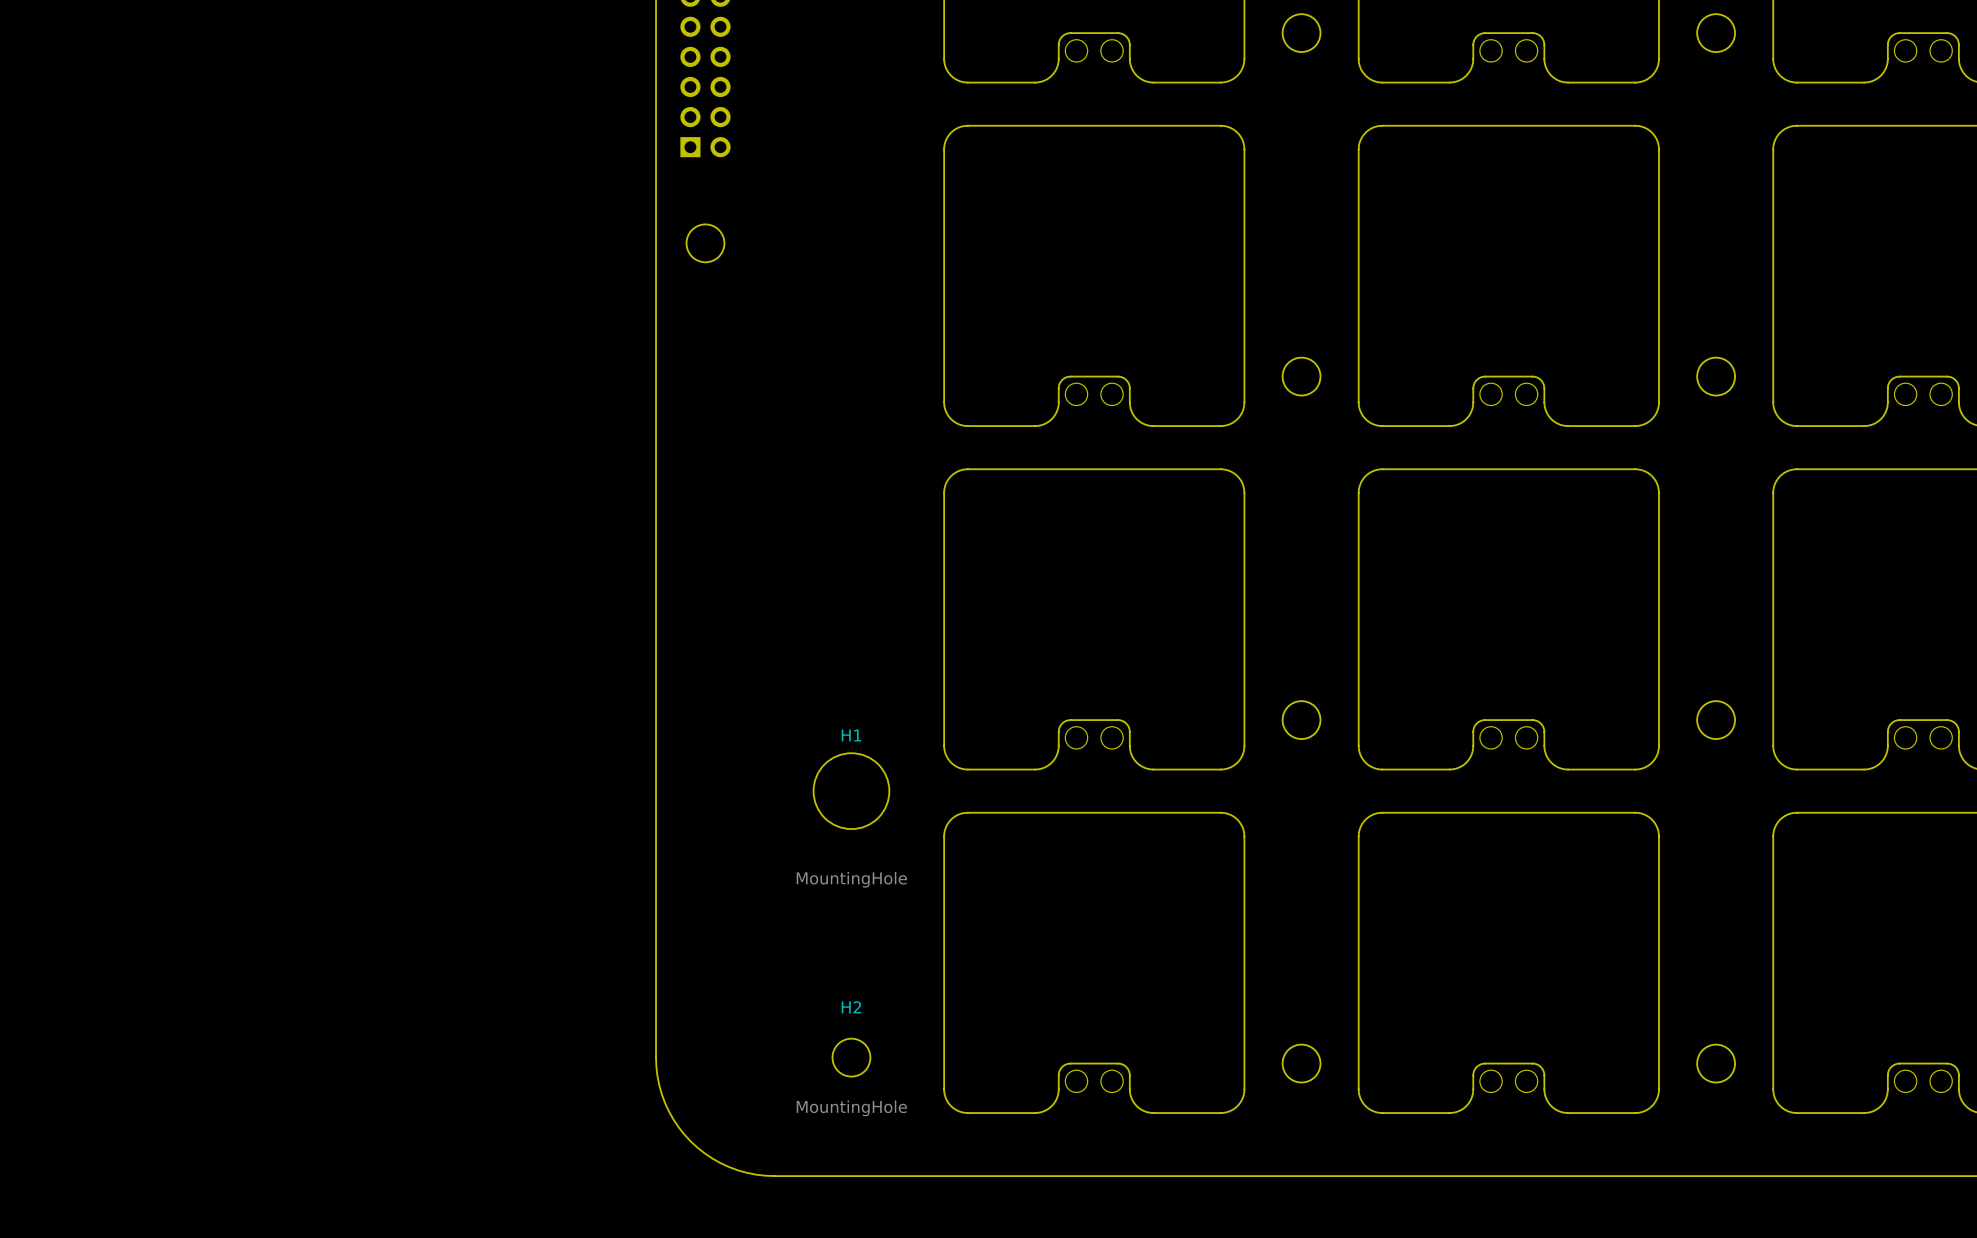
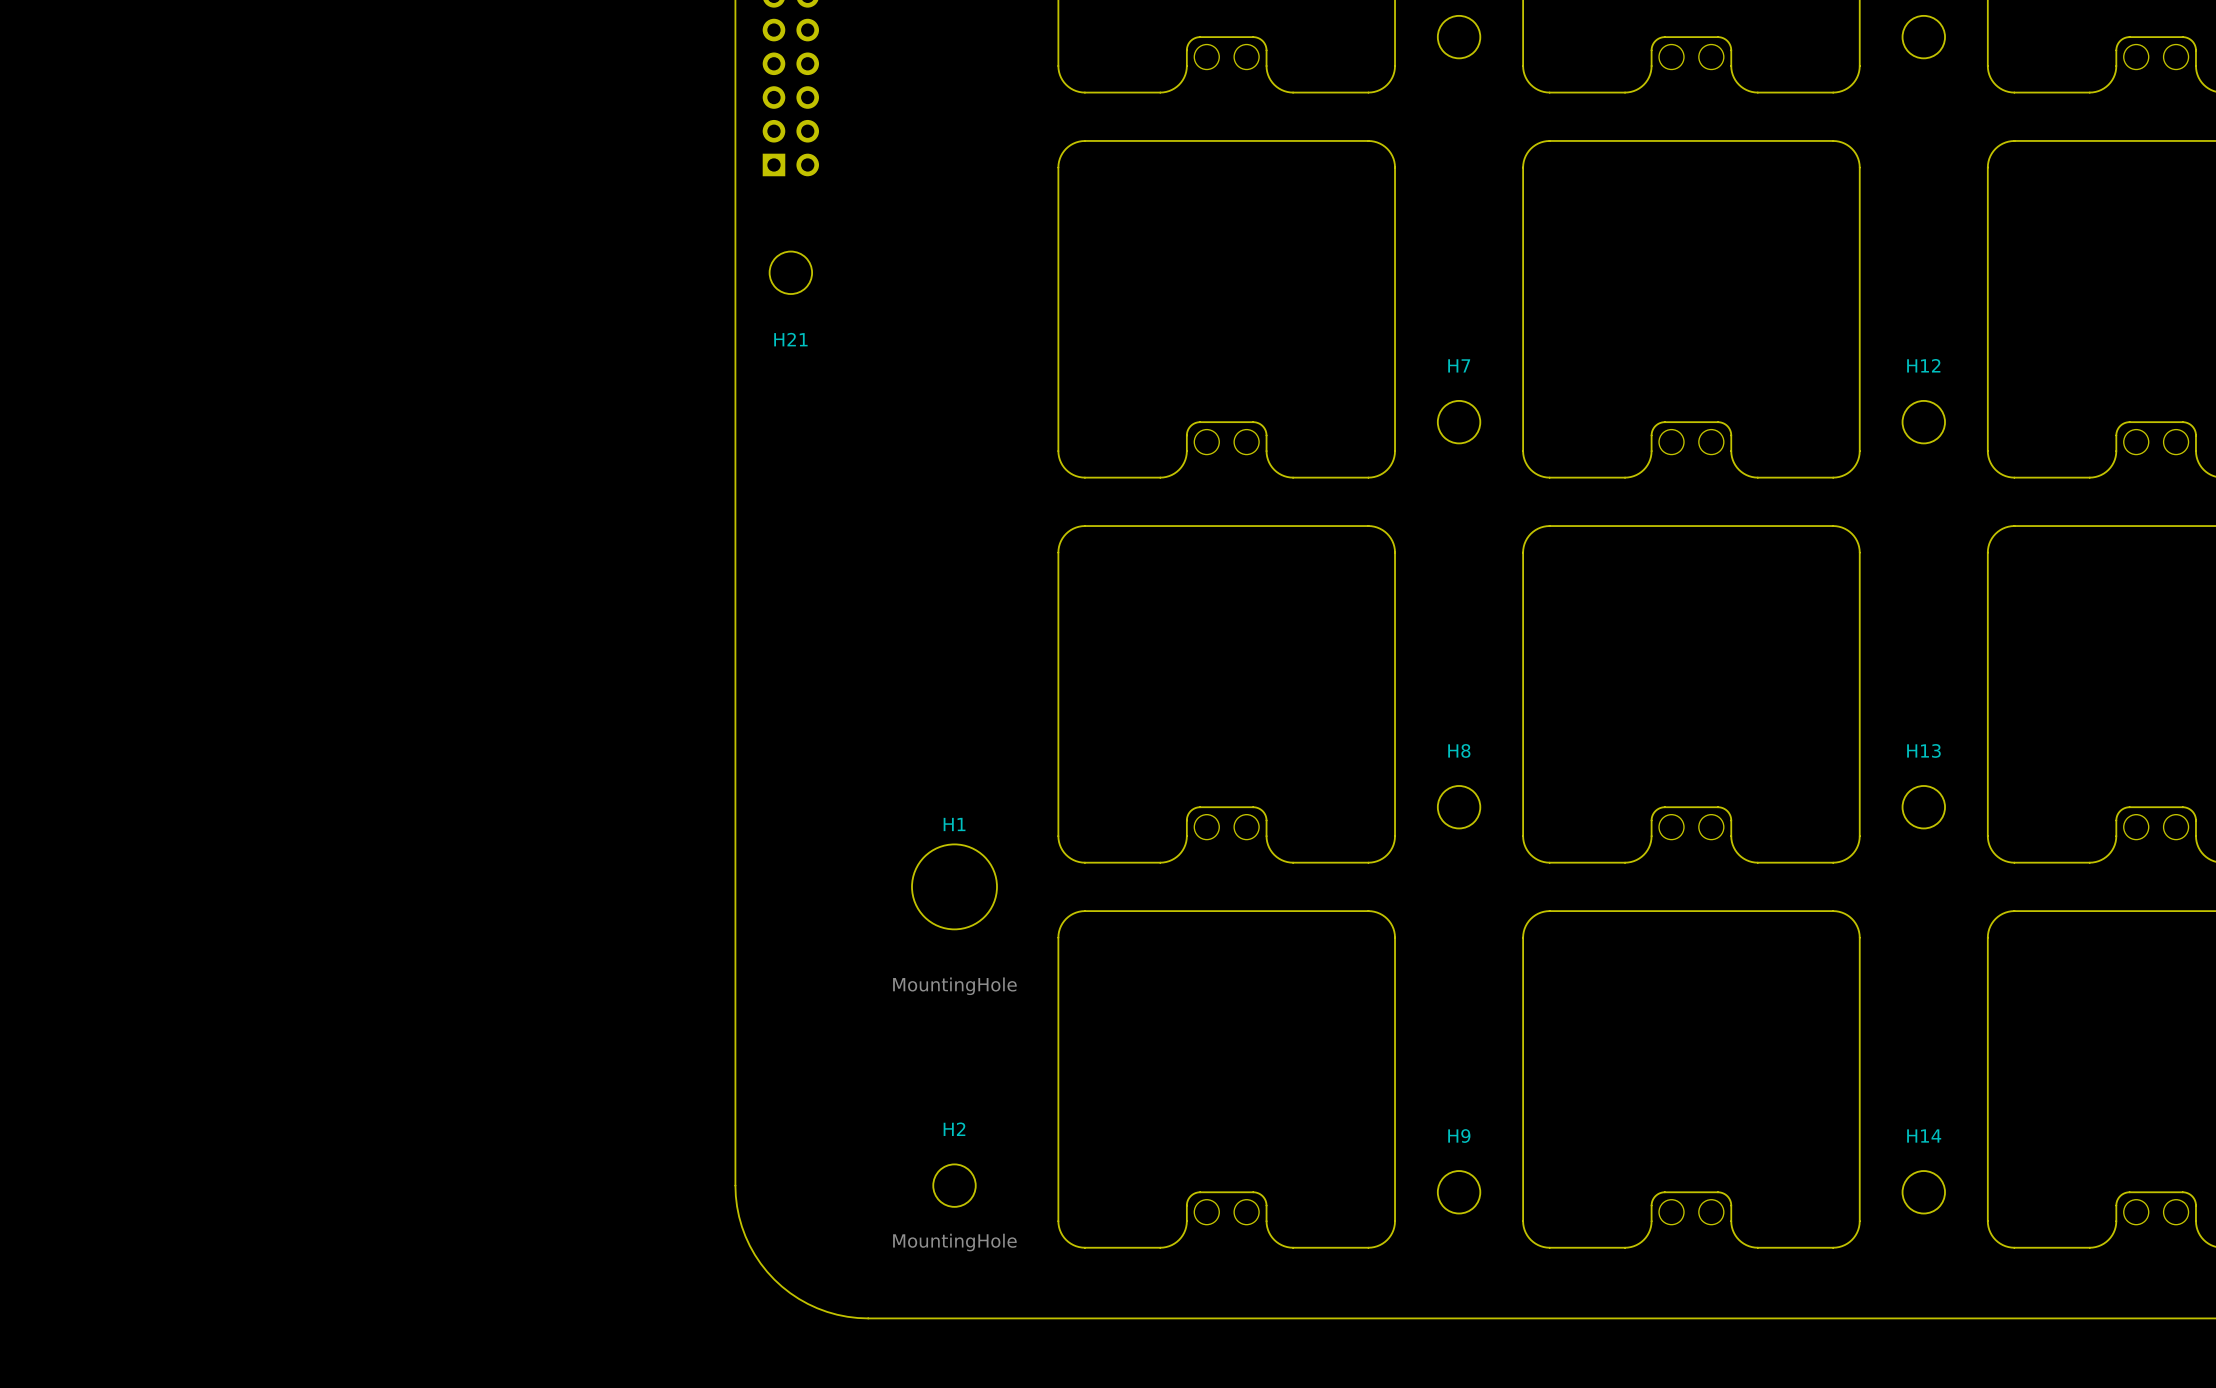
H21 name: none -> H21 (790, 339)
H7 name: none -> H7 (1459, 365)
H12 name: none -> H12 (1923, 365)
H8 name: none -> H8 (1459, 750)
H13 name: none -> H13 (1923, 750)
H9 name: none -> H9 (1459, 1136)
H14 name: none -> H14 (1924, 1136)

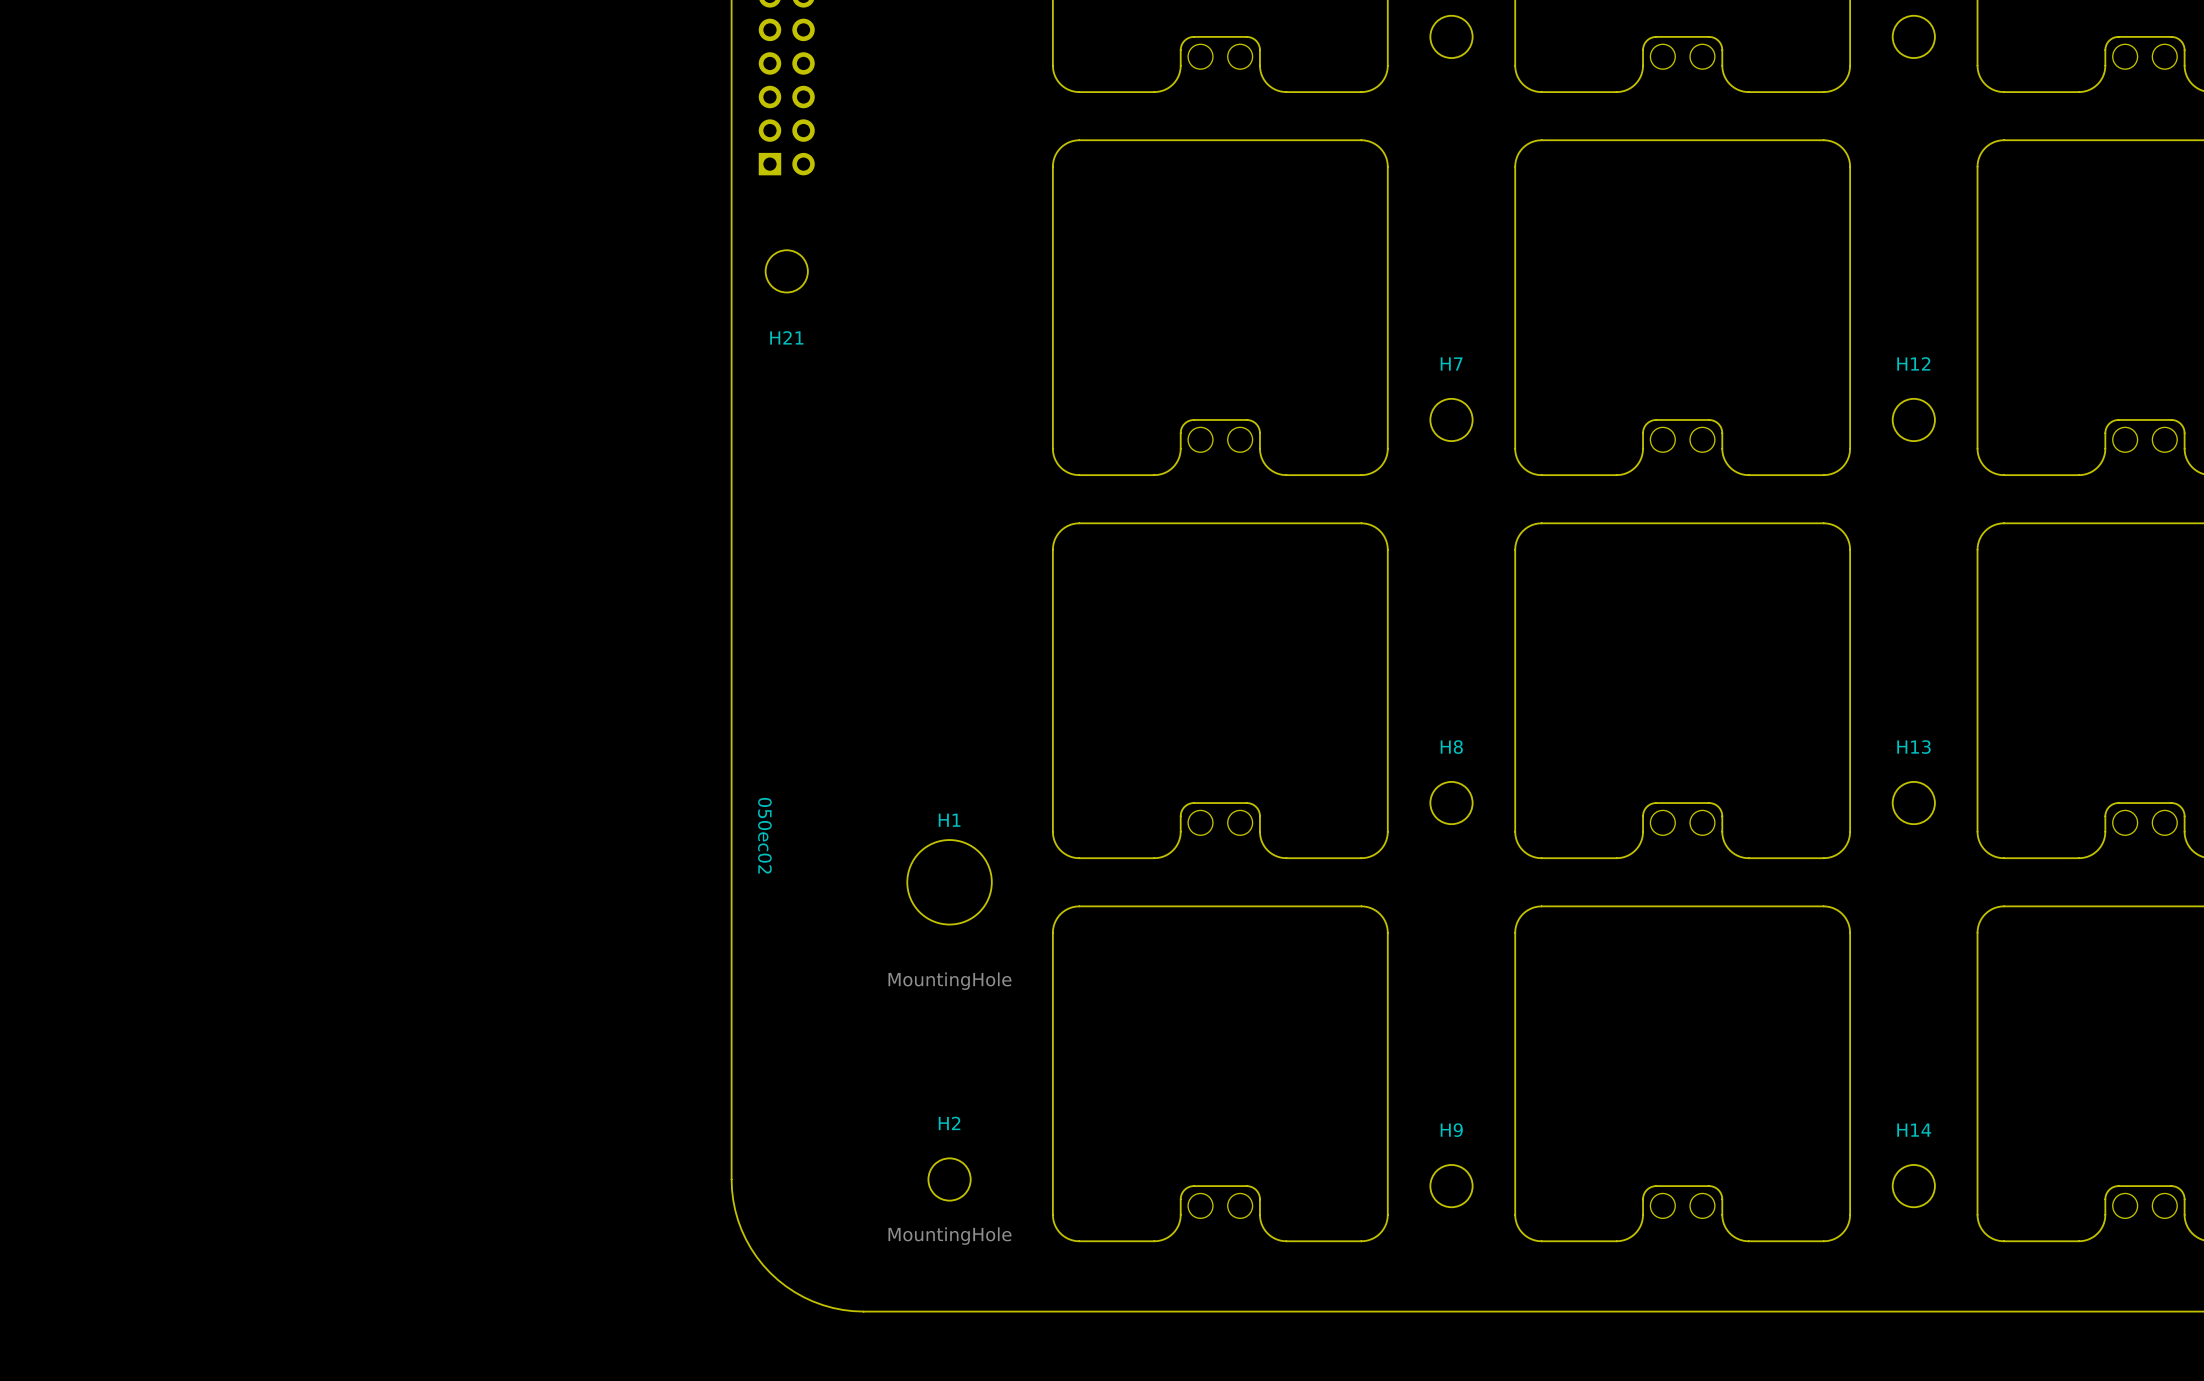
text: none -> 050ec02 (764, 835)

